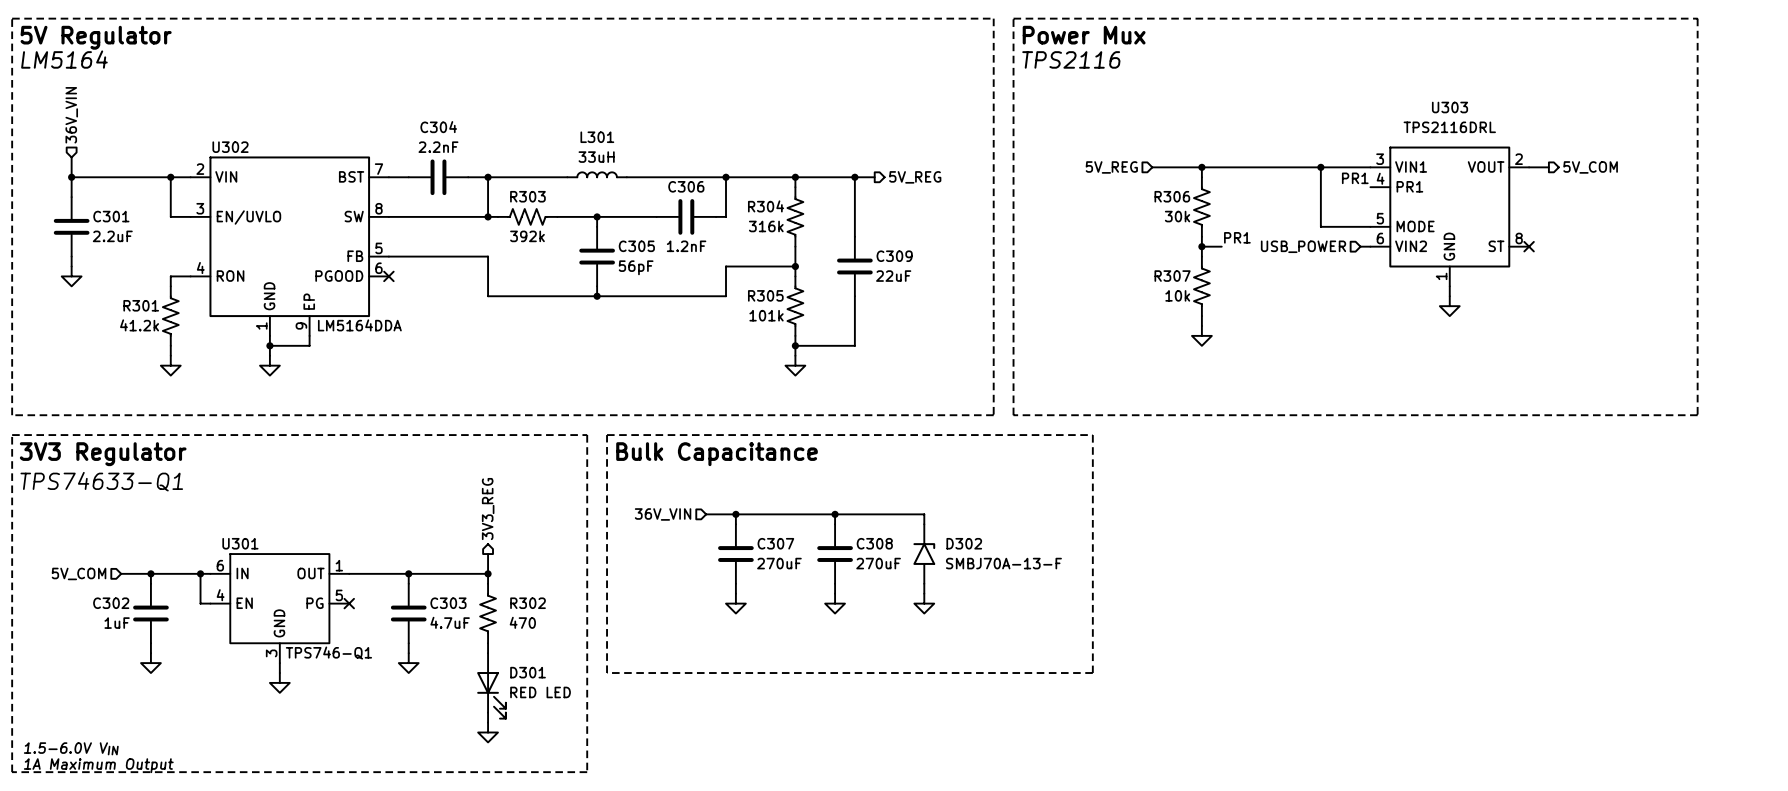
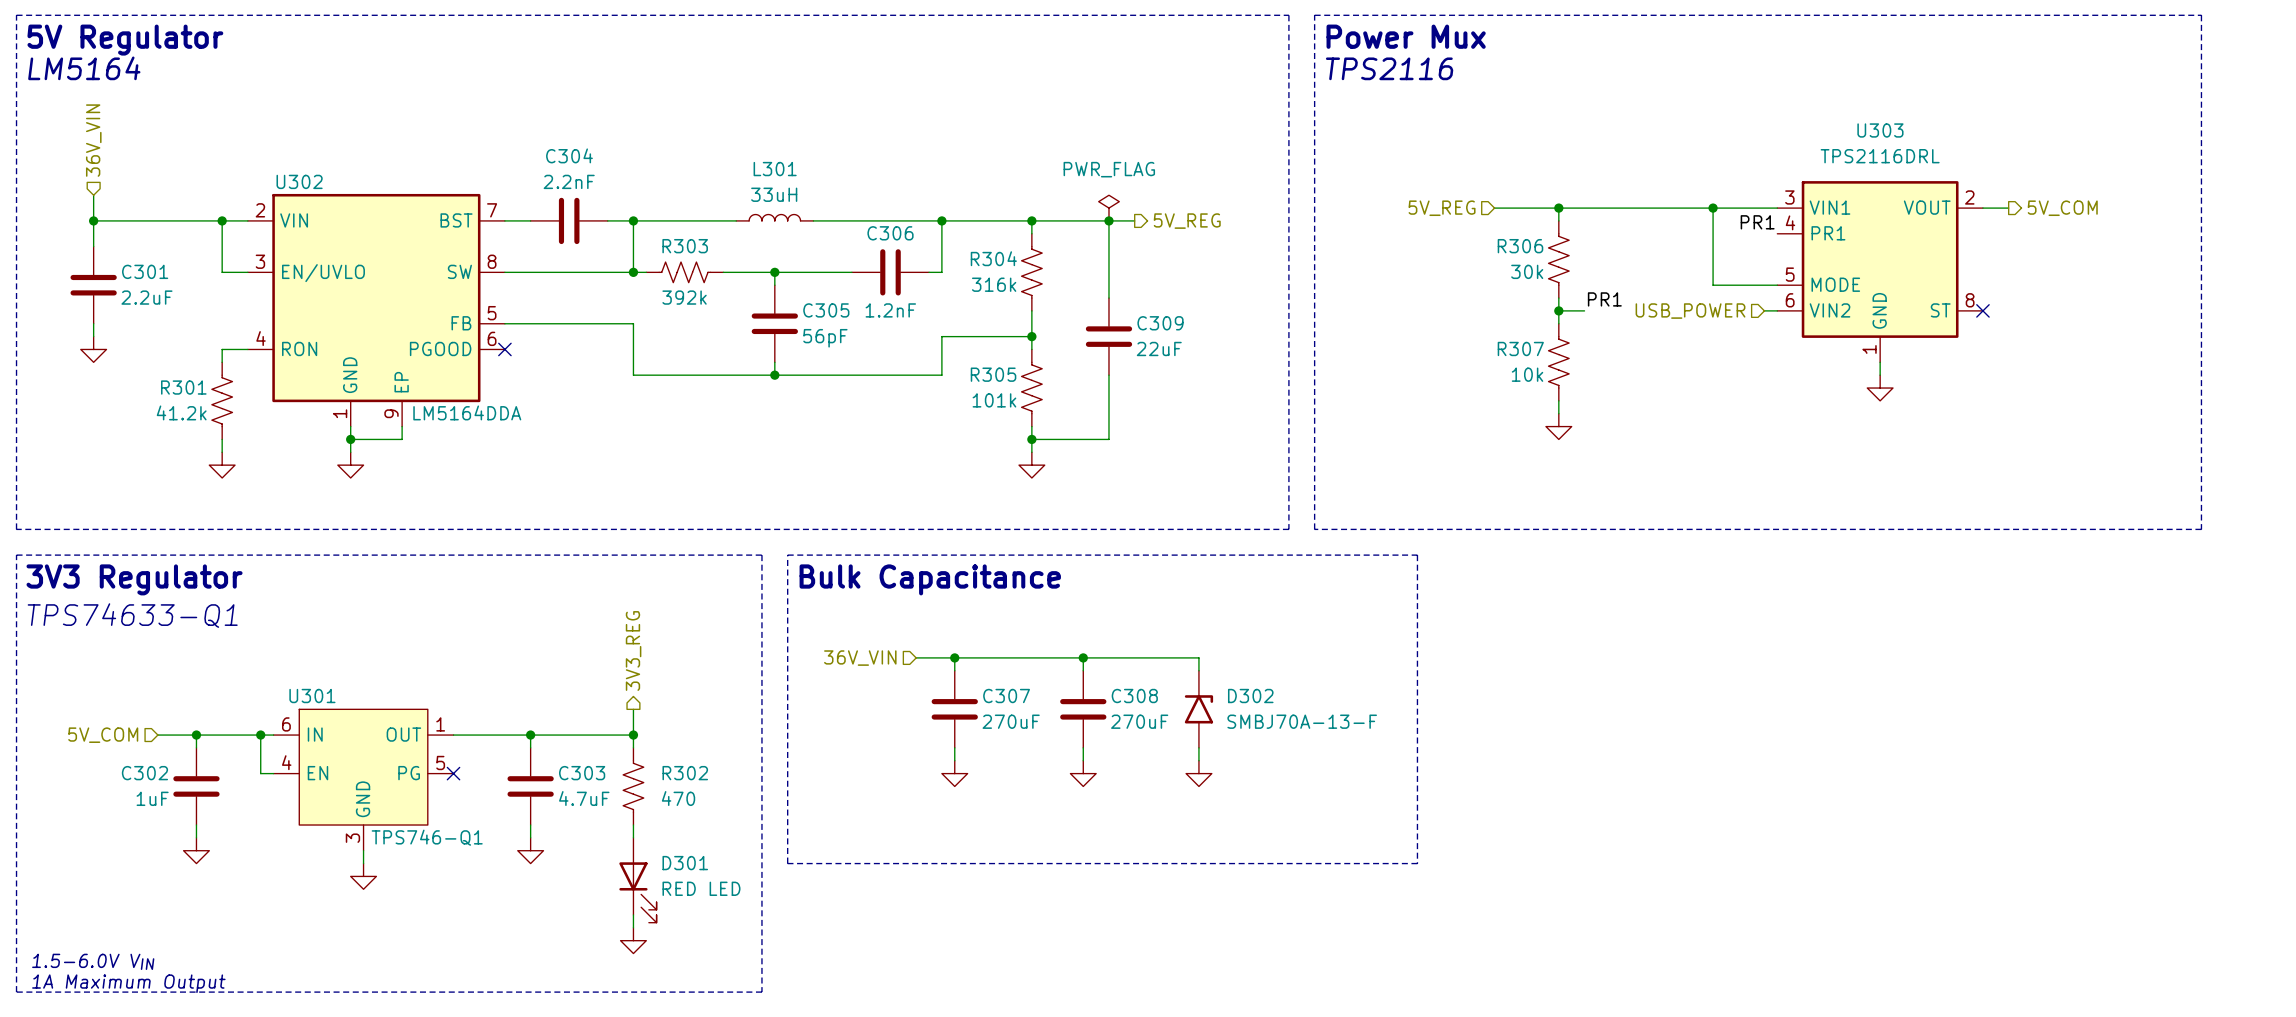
power symbol: none -> PWR_FLAG (1108, 208)

